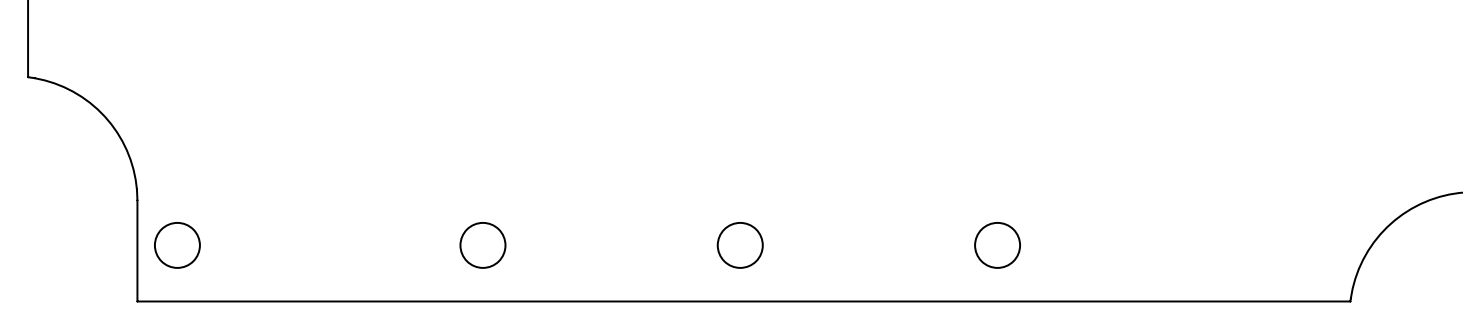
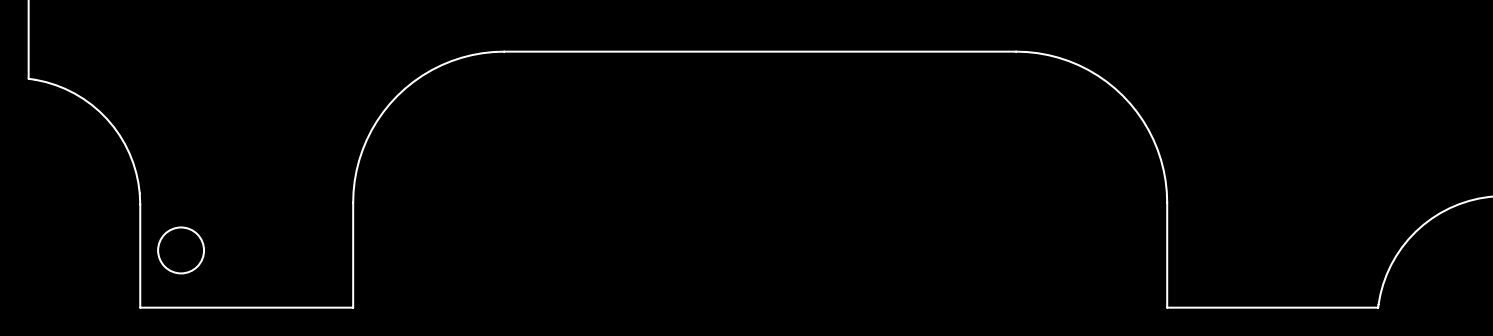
round board edge: [459, 221, 507, 269] -> none
round board edge: [716, 221, 764, 269] -> none
round board edge: [974, 221, 1022, 269] -> none
board edge: (1143, 301) (346, 301) -> (1167, 307) (1166, 191) (1161, 160) (1148, 130) (1137, 112) (1122, 95) (1106, 81) (1088, 70) (1058, 57) (1037, 53) (1016, 51) (504, 51) (472, 55) (451, 61) (422, 75) (397, 95) (377, 121) (362, 149) (356, 170) (353, 191) (353, 307)

